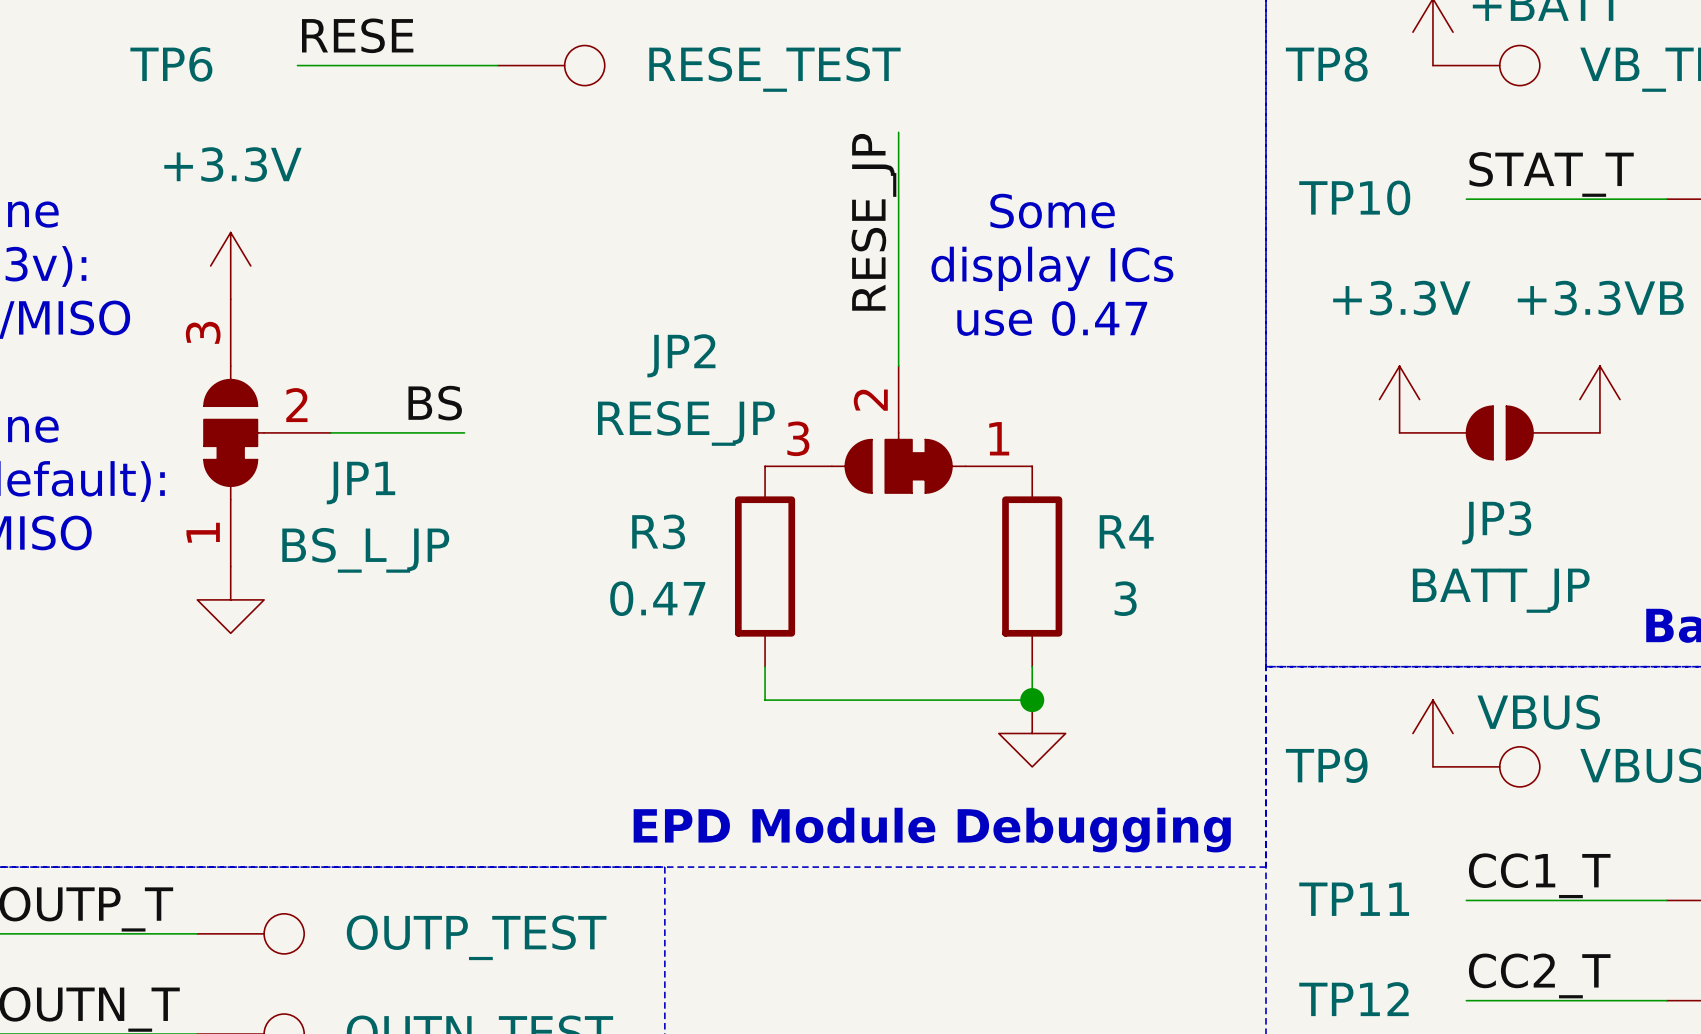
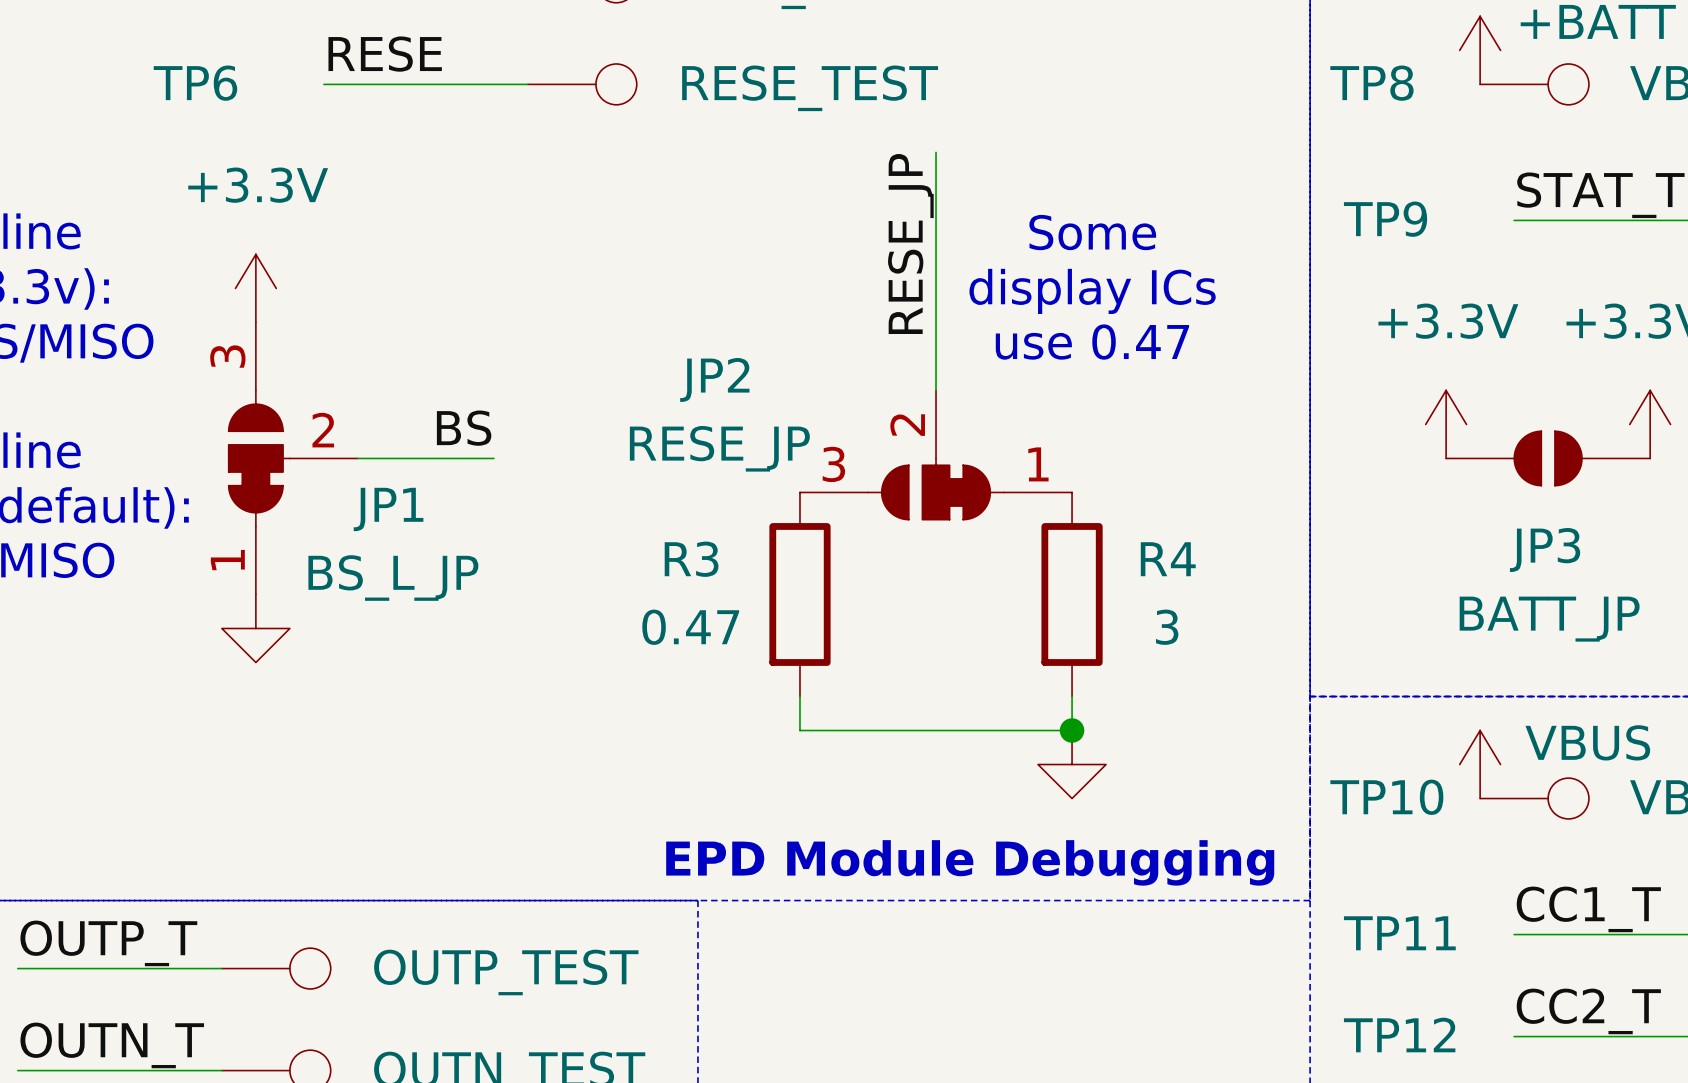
TP10 name: TP10 (1354, 197) -> TP9 (1385, 219)
TP9 name: TP9 (1326, 765) -> TP10 (1386, 797)

